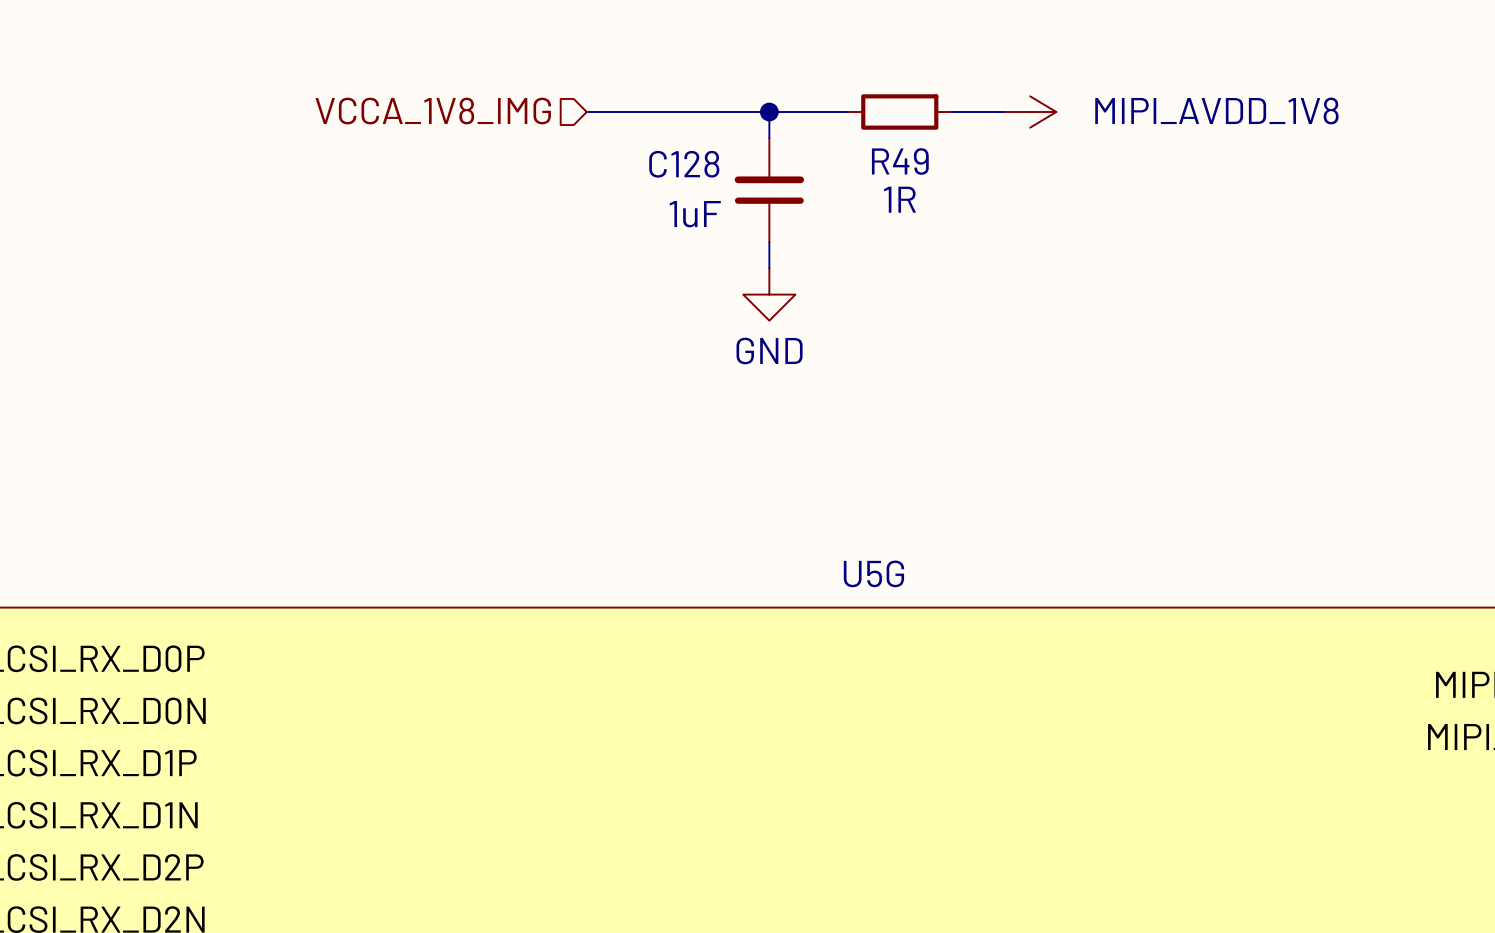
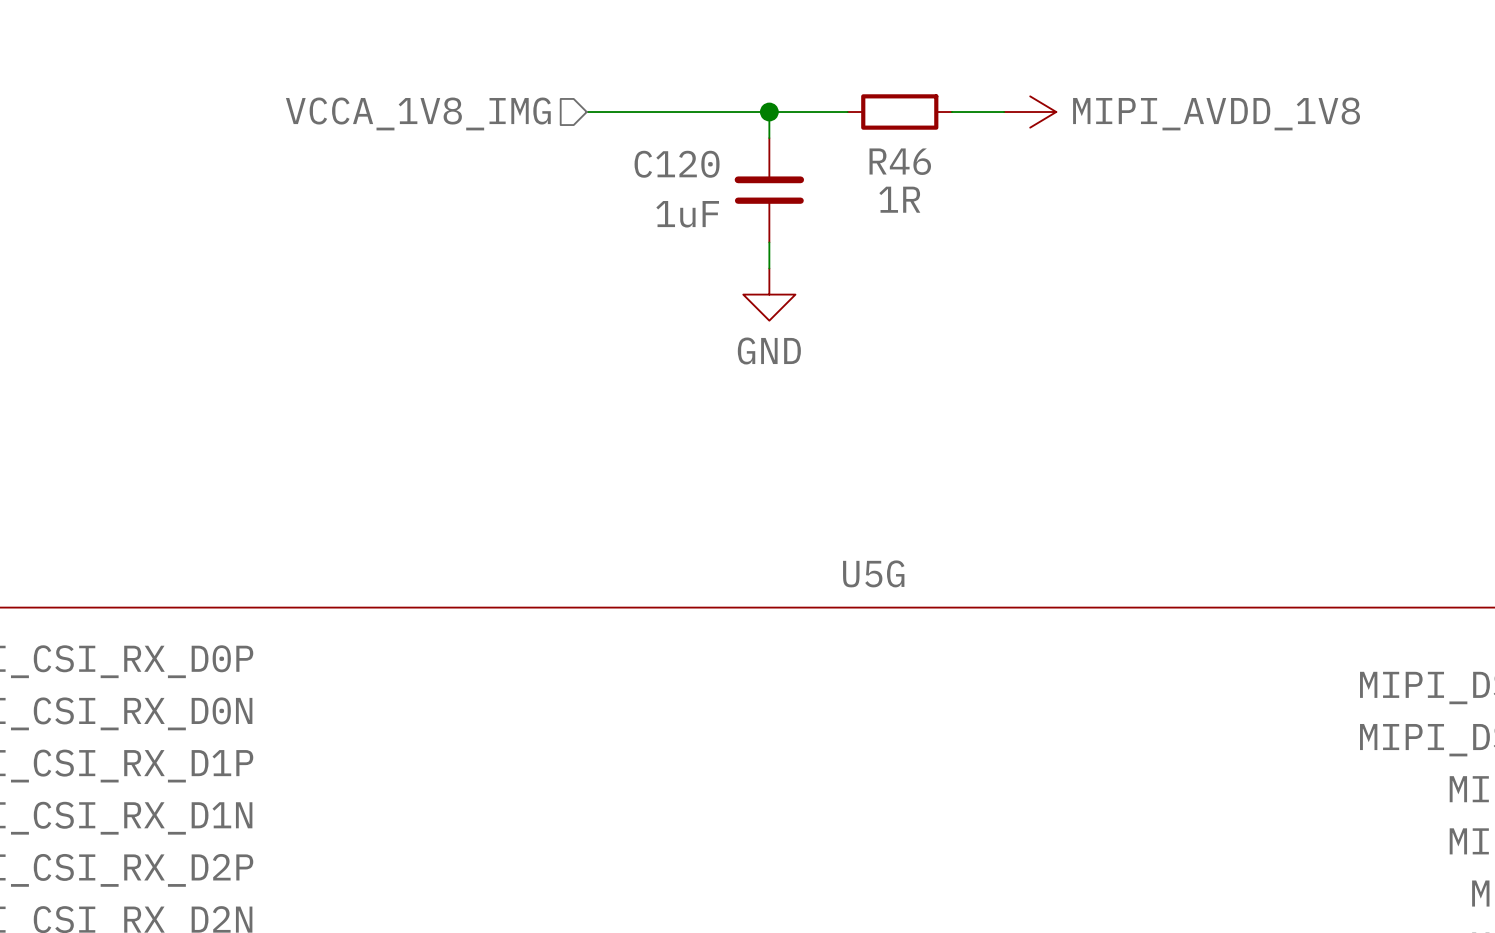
R49 name: R49 (900, 161) -> R46 (900, 161)
C128 name: C128 (684, 164) -> C120 (677, 164)

